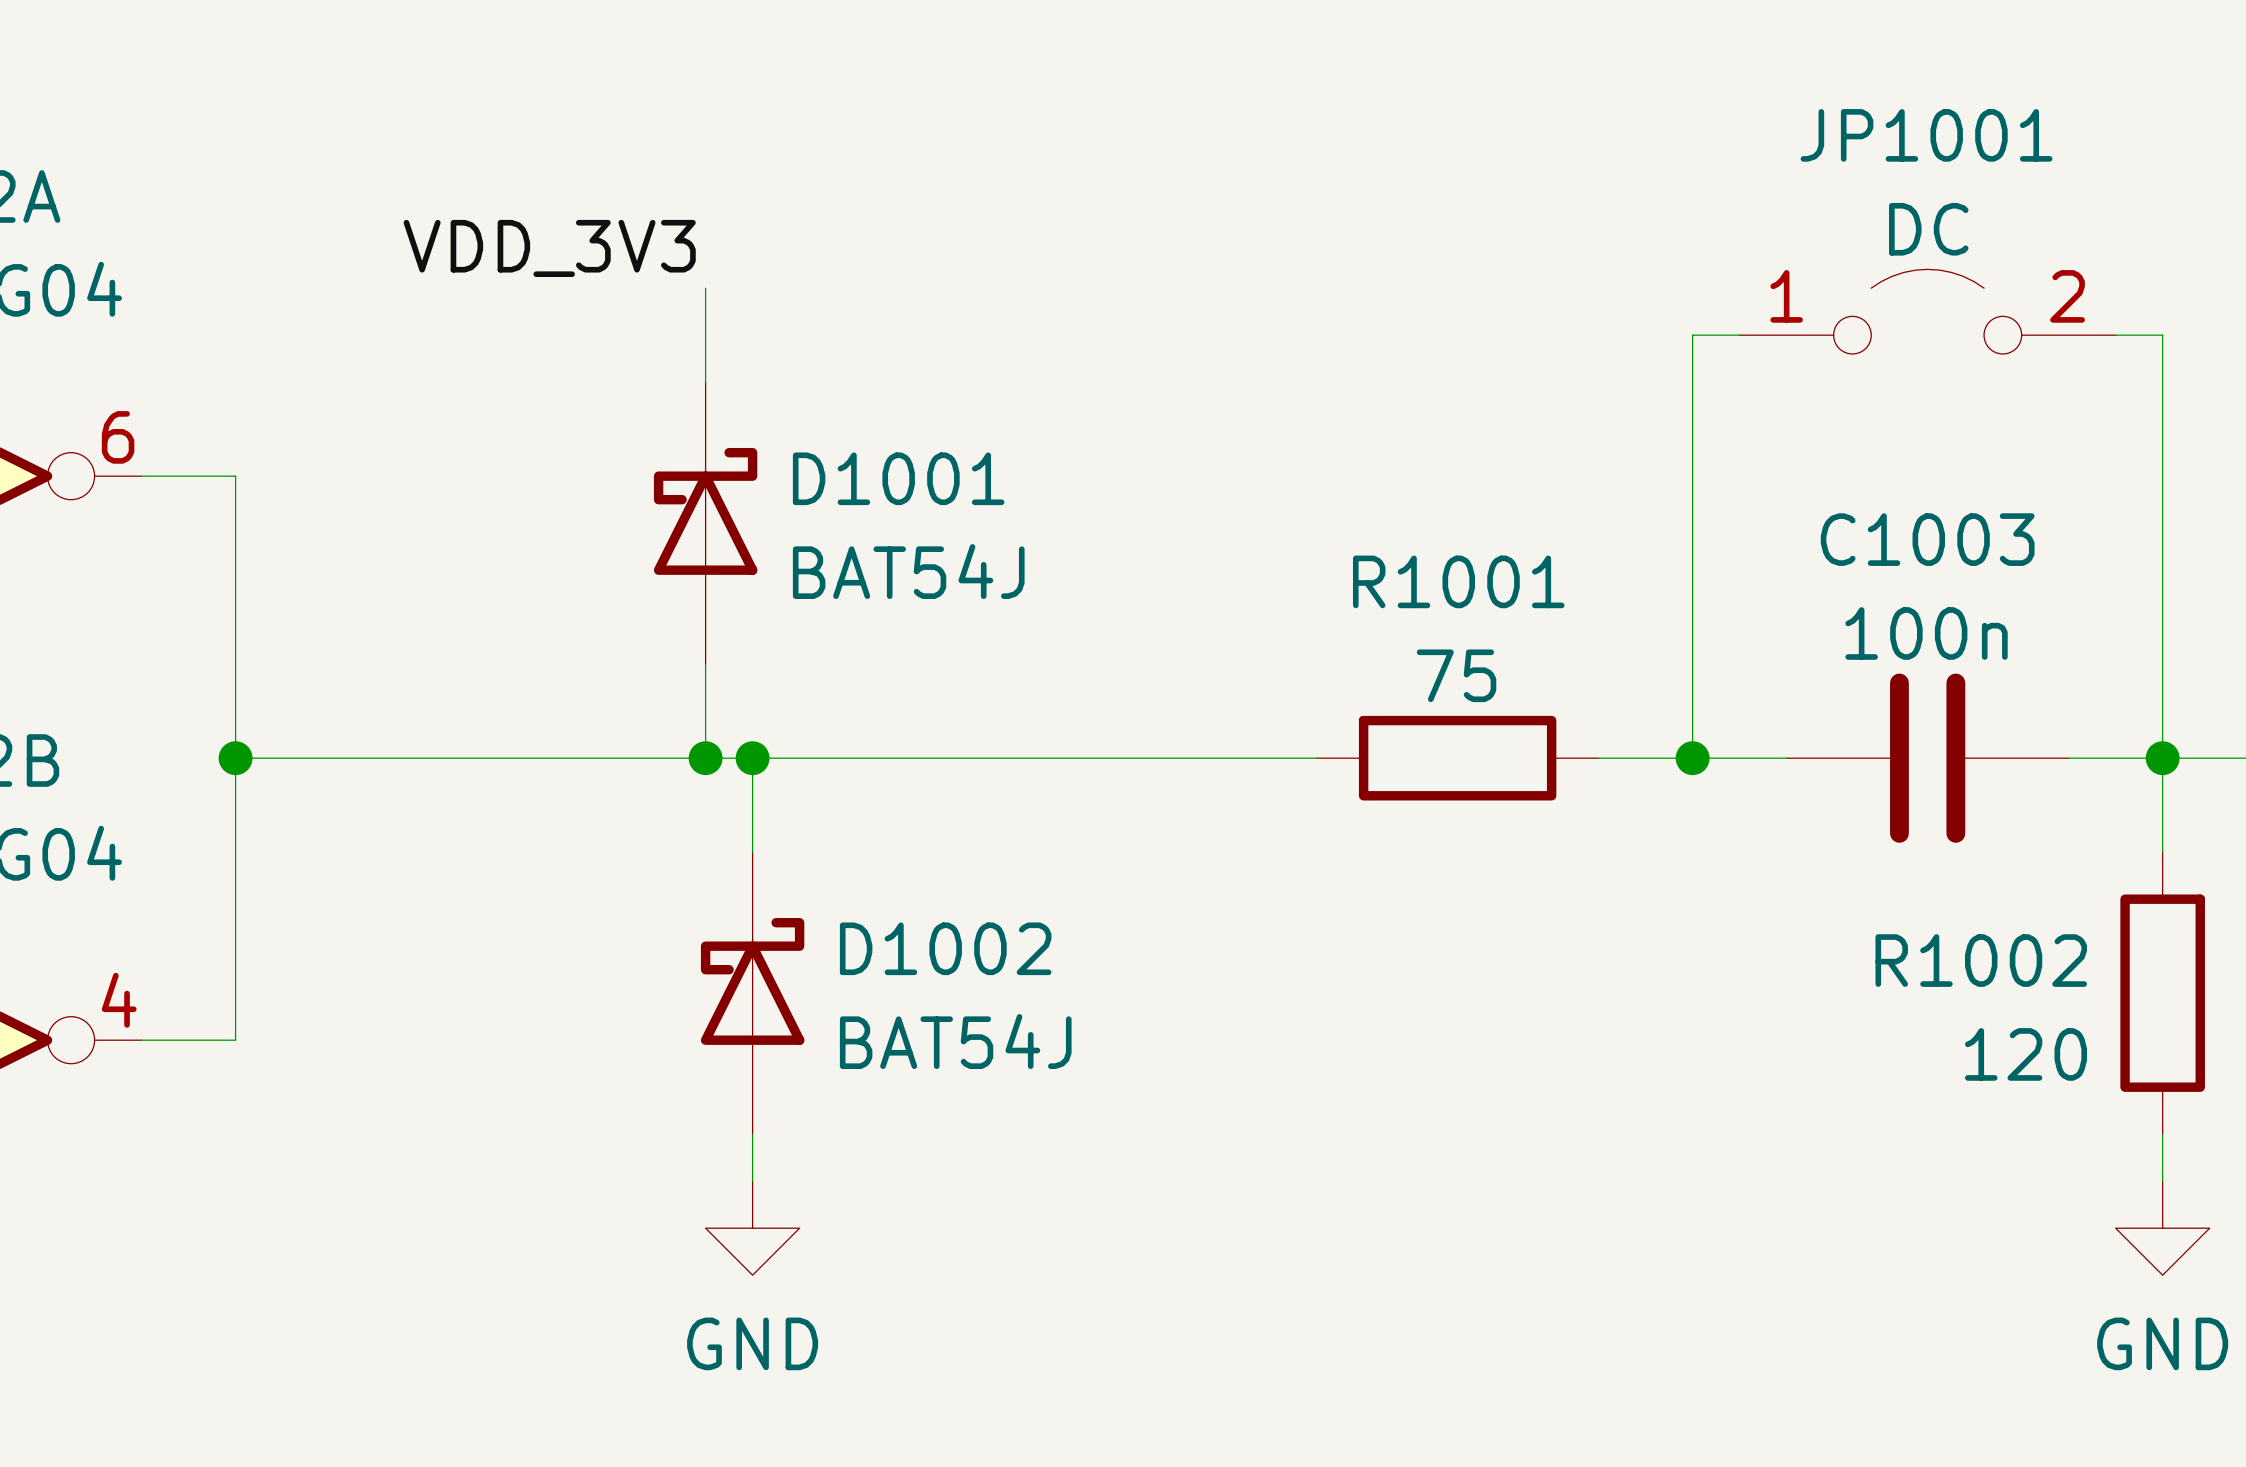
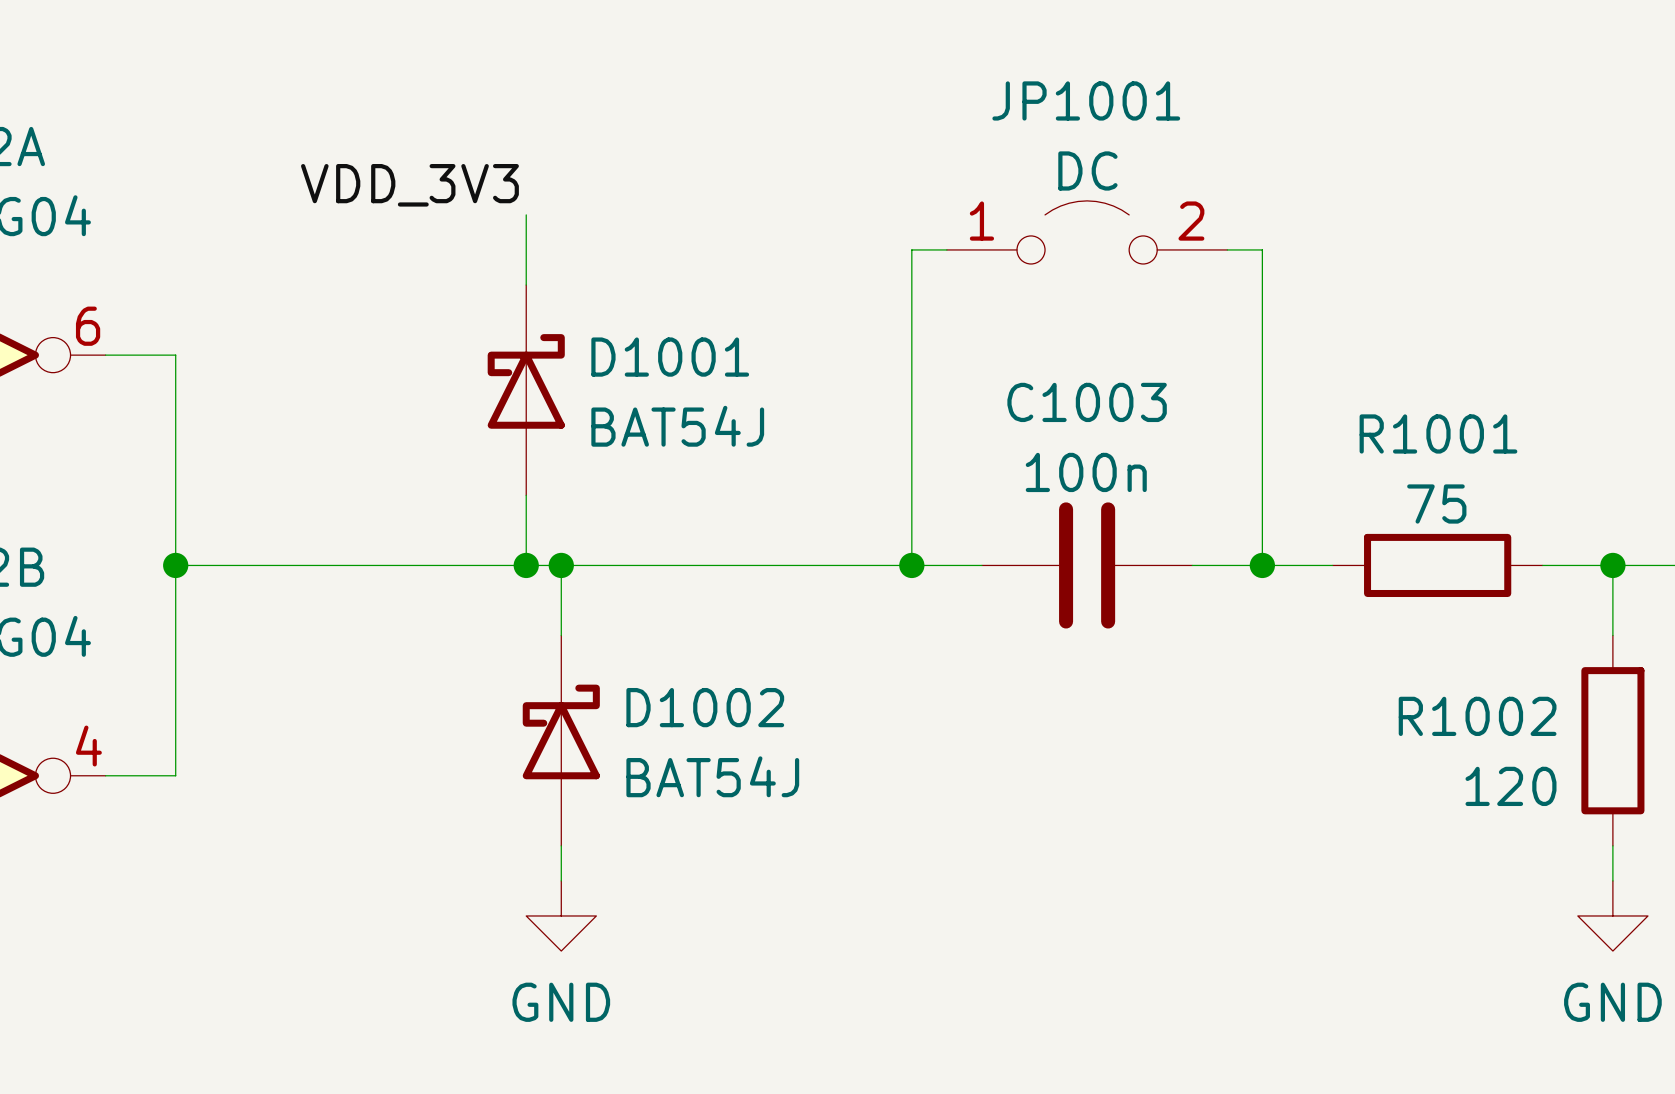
JP1001 position: (1927, 311) -> (1087, 232)
wire: none -> (946, 249) (911, 249) (911, 565)
wire: (1692, 335) (1739, 335) -> (1262, 249) (1227, 249)
wire: (2115, 335) (2162, 335) (2162, 758) -> none
junction: none -> (911, 565)
R1001 position: (1457, 758) -> (1437, 565)
C1003 position: (1927, 758) -> (1087, 565)

